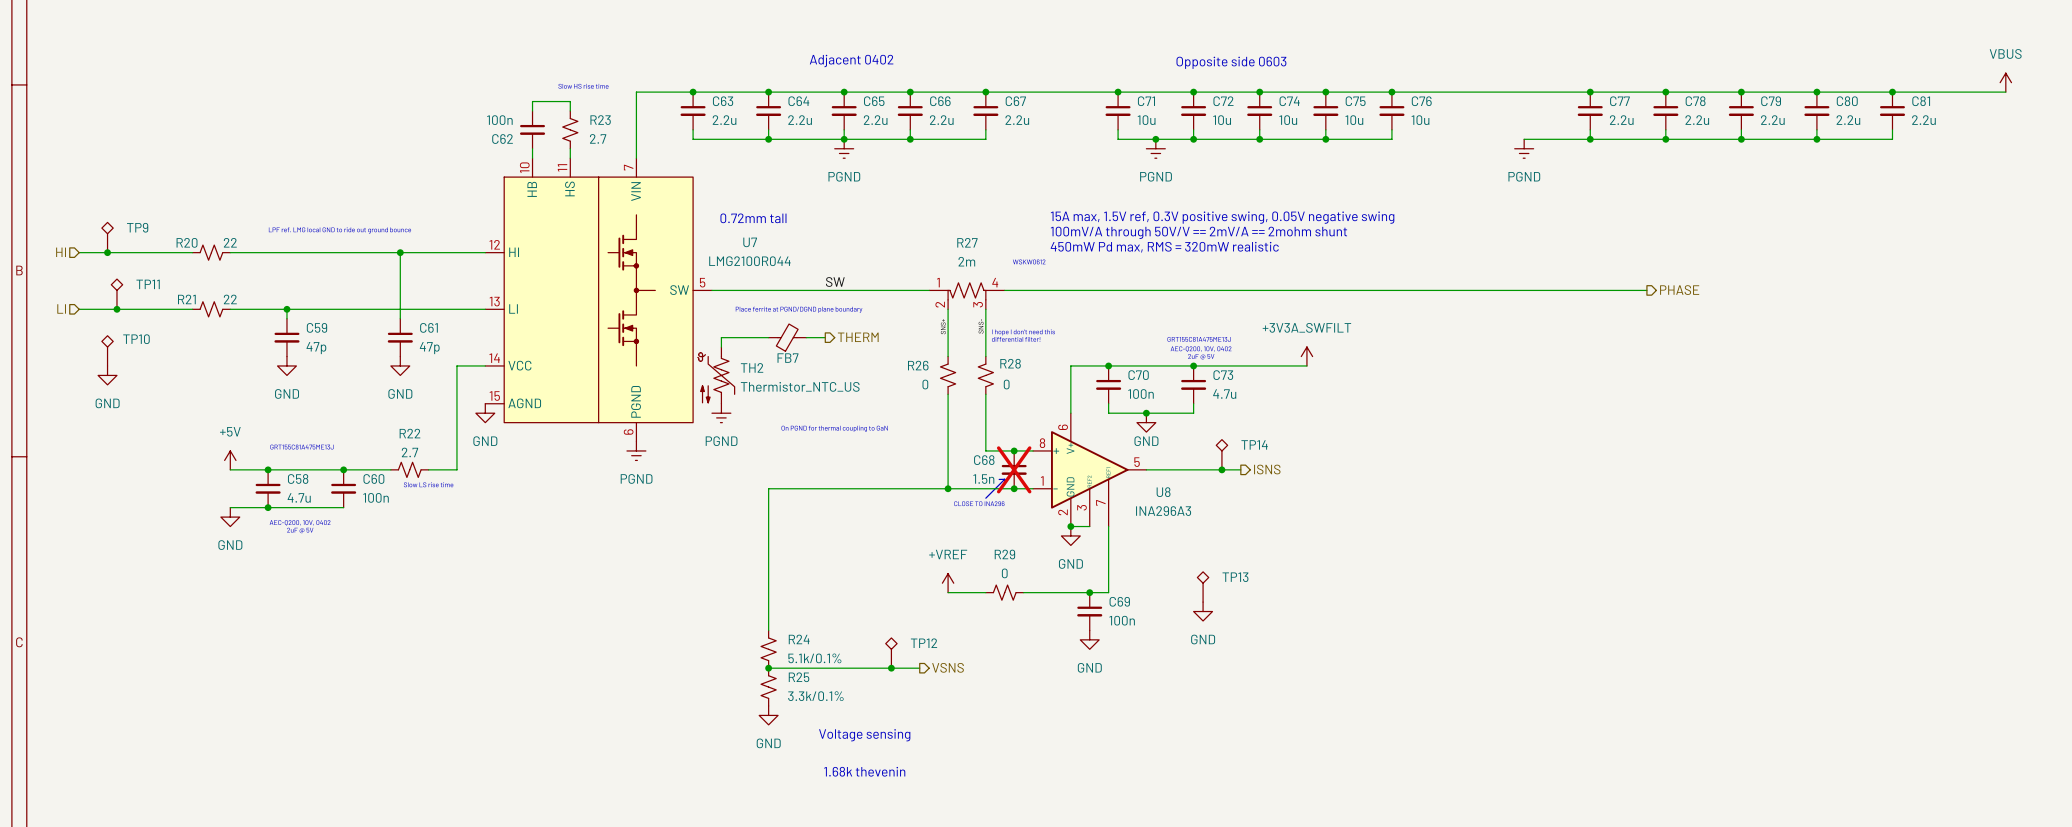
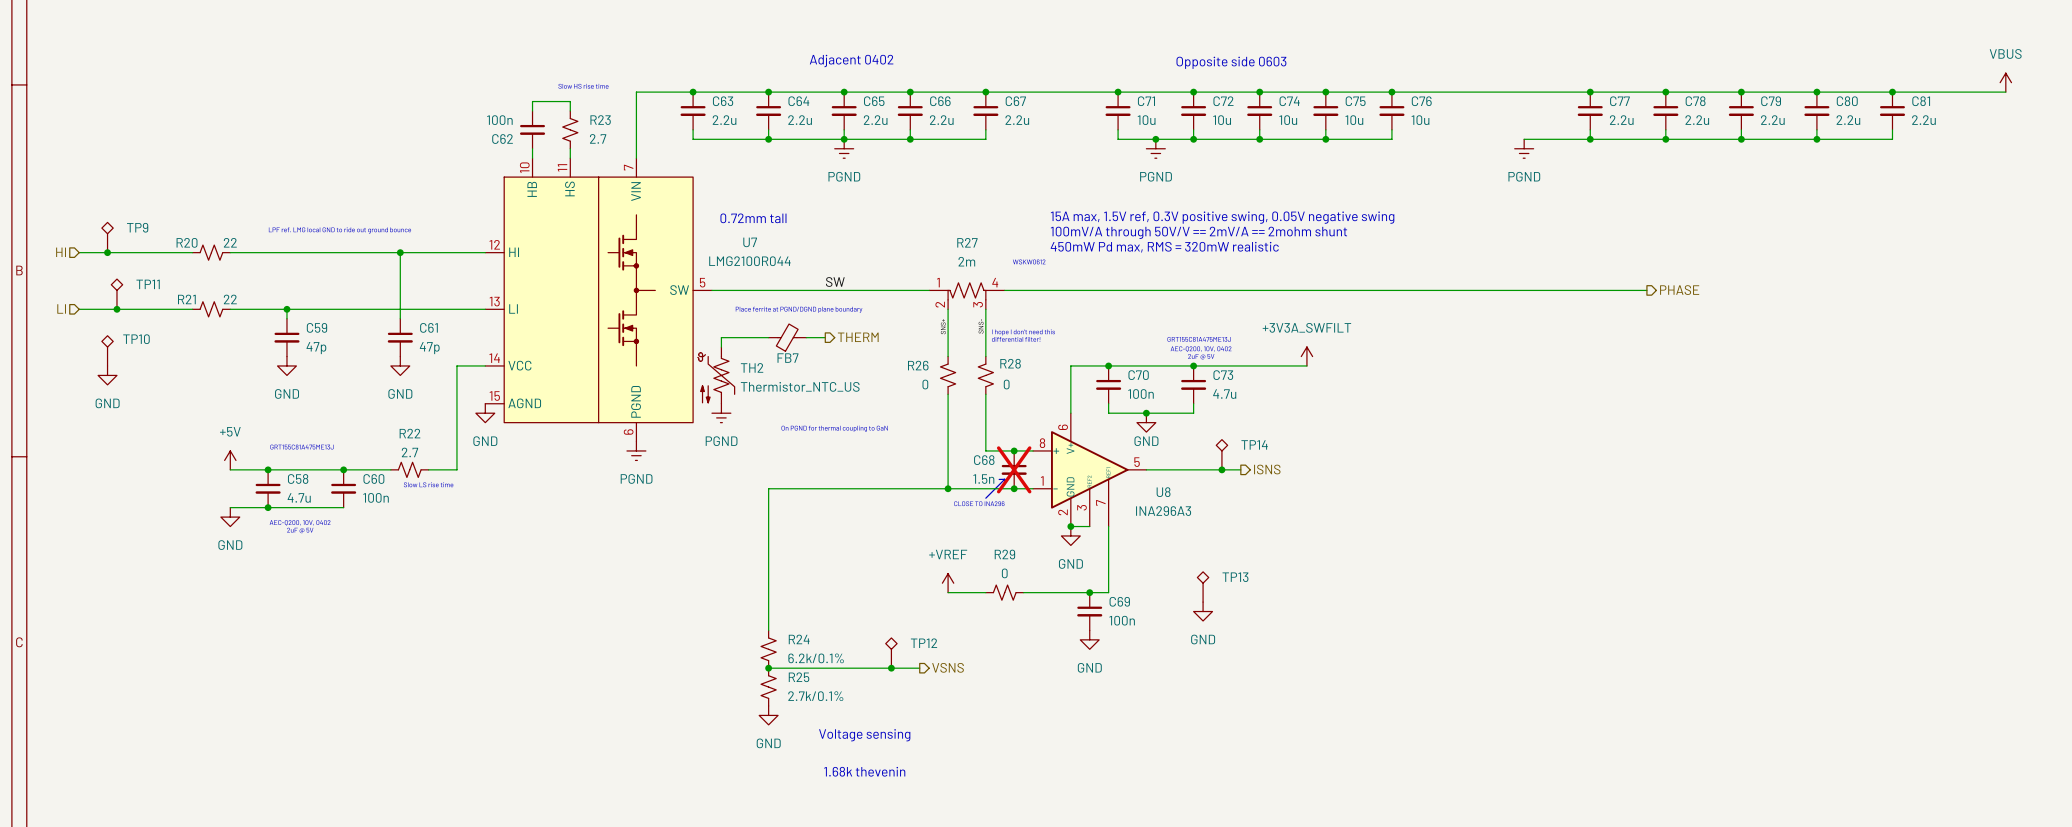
R24 value: 5.1k/0.1% (814, 658) -> 6.2k/0.1% (816, 658)
R25 value: 3.3k/0.1% (815, 696) -> 2.7k/0.1% (815, 696)

